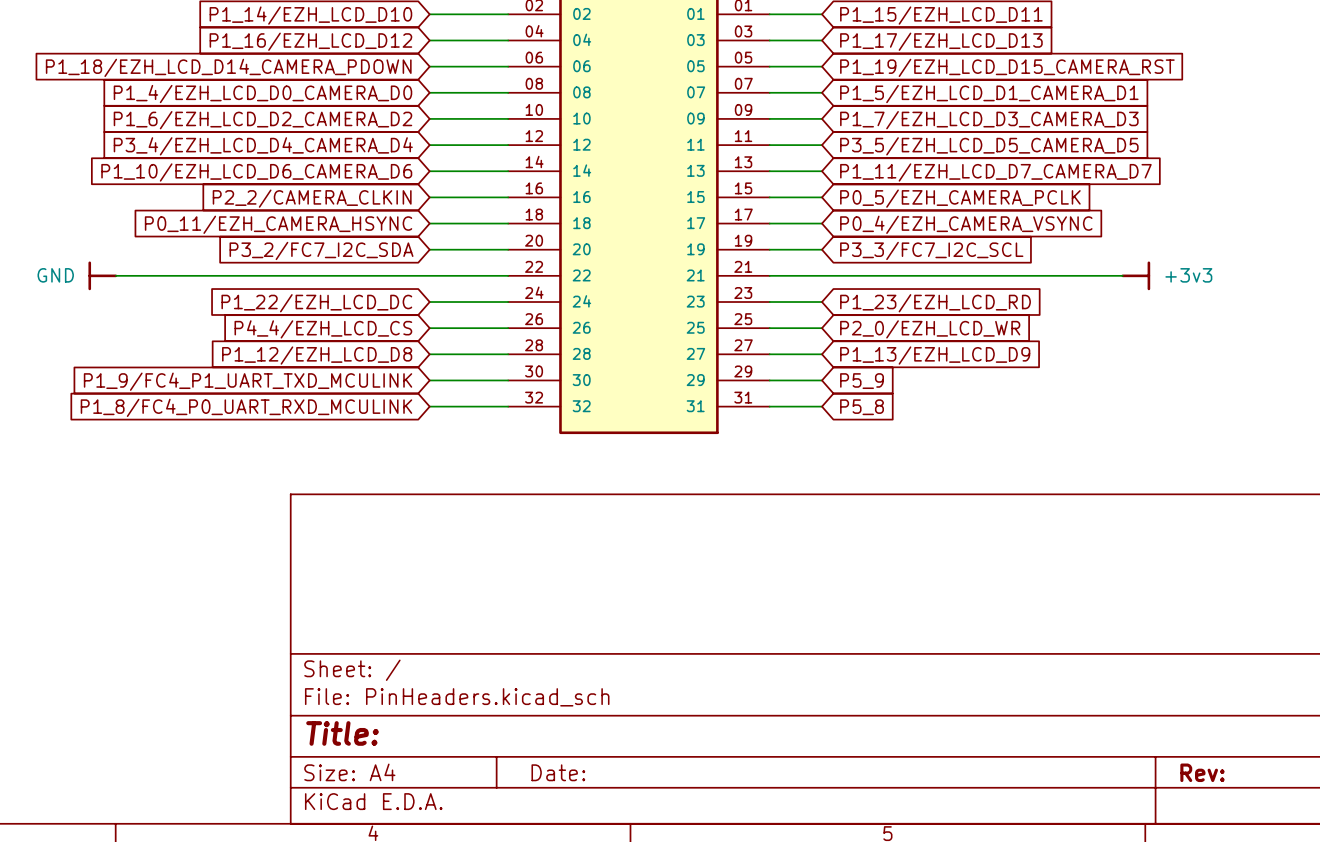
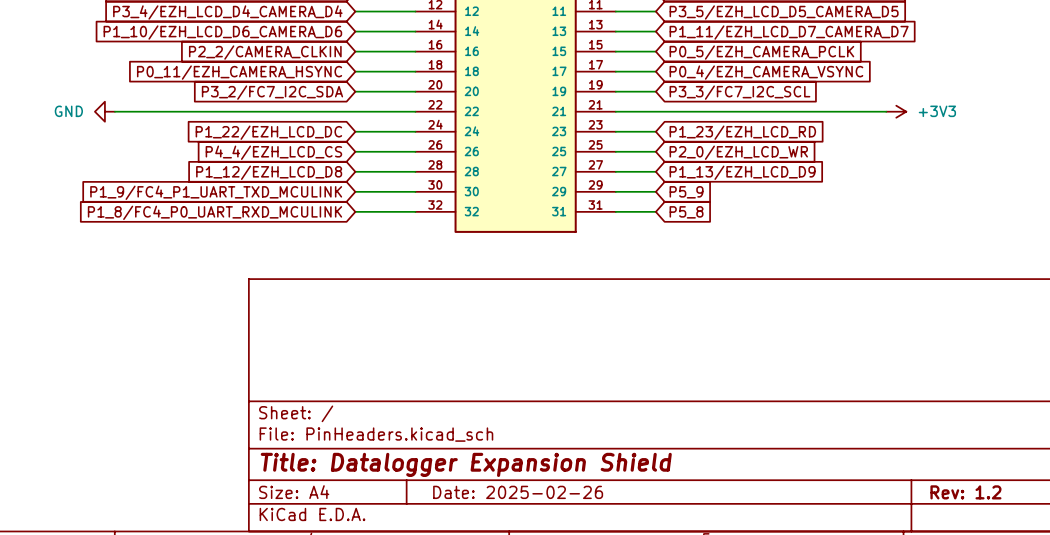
power symbol shape: [88, 261, 118, 291] -> [94, 101, 115, 122]
power symbol: +3v3 (1135, 275) -> +3V3 (896, 111)
title block: Title: (342, 733) -> Title: Datalogger Expansion Shield (466, 464)
title block: Date: (558, 772) -> Date: 2025-02-26 (518, 492)
title block: Rev: (1202, 772) -> Rev: 1.2 (965, 492)

